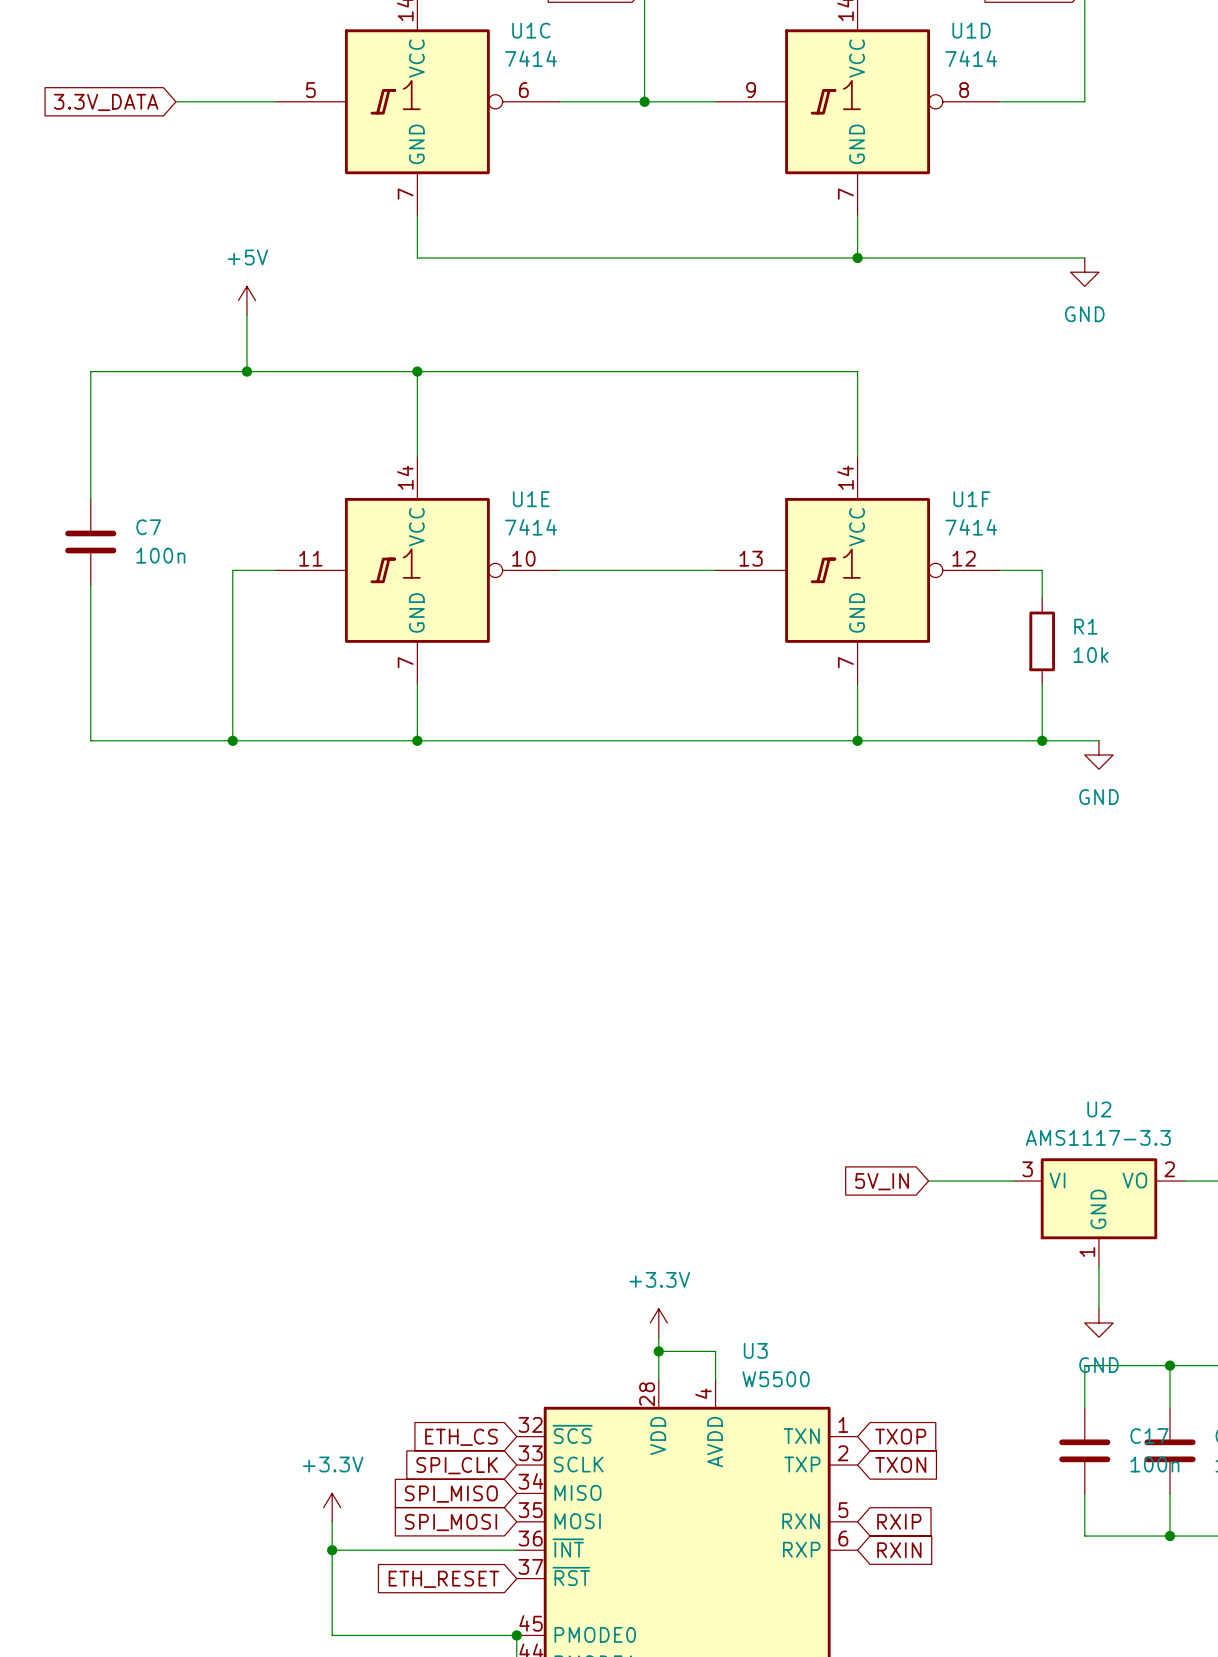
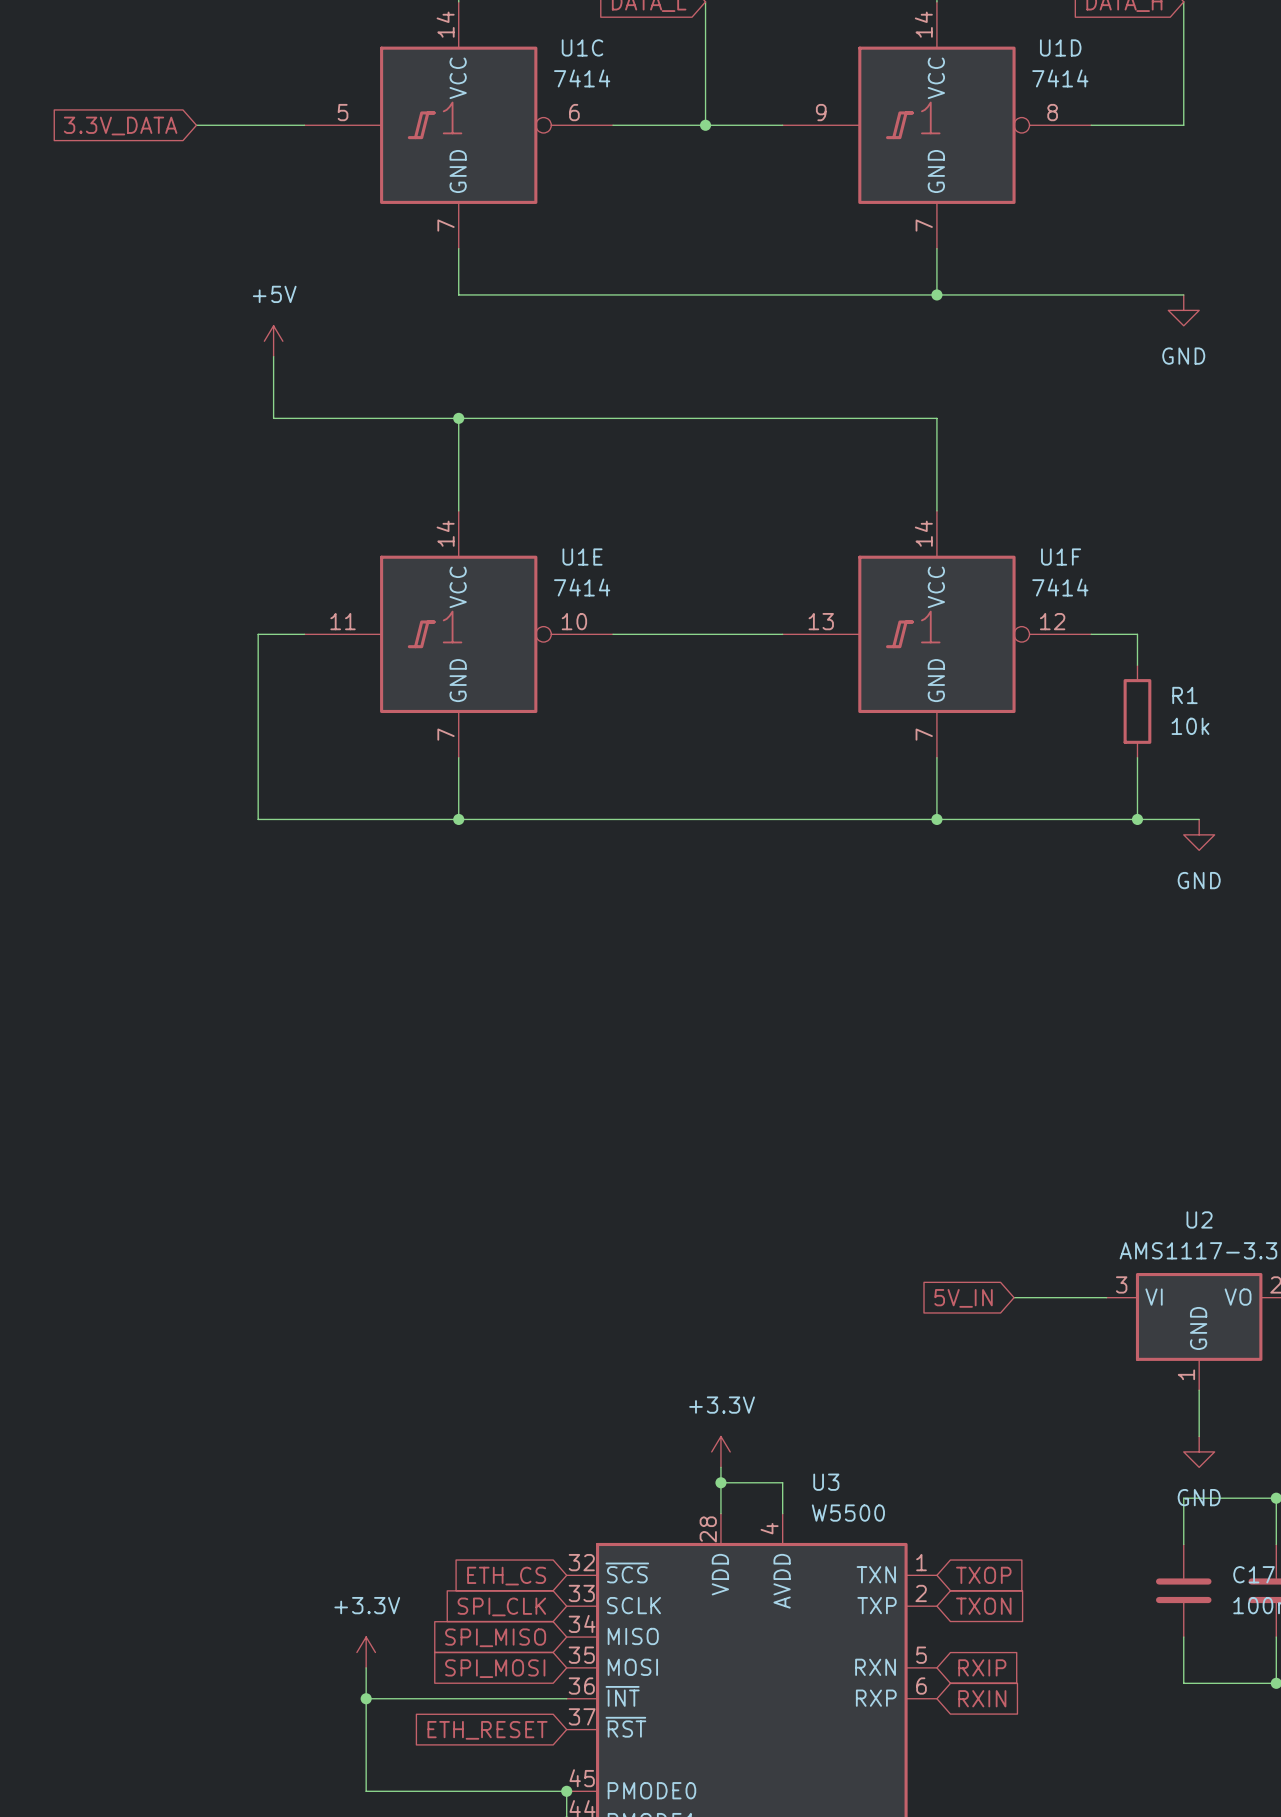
wire: (246, 371) (90, 371) (90, 499) -> none
junction: (246, 371) -> none
C7: 100n (90, 542) -> none
wire: (90, 584) (90, 740) (232, 740) -> none
junction: (232, 740) -> none

